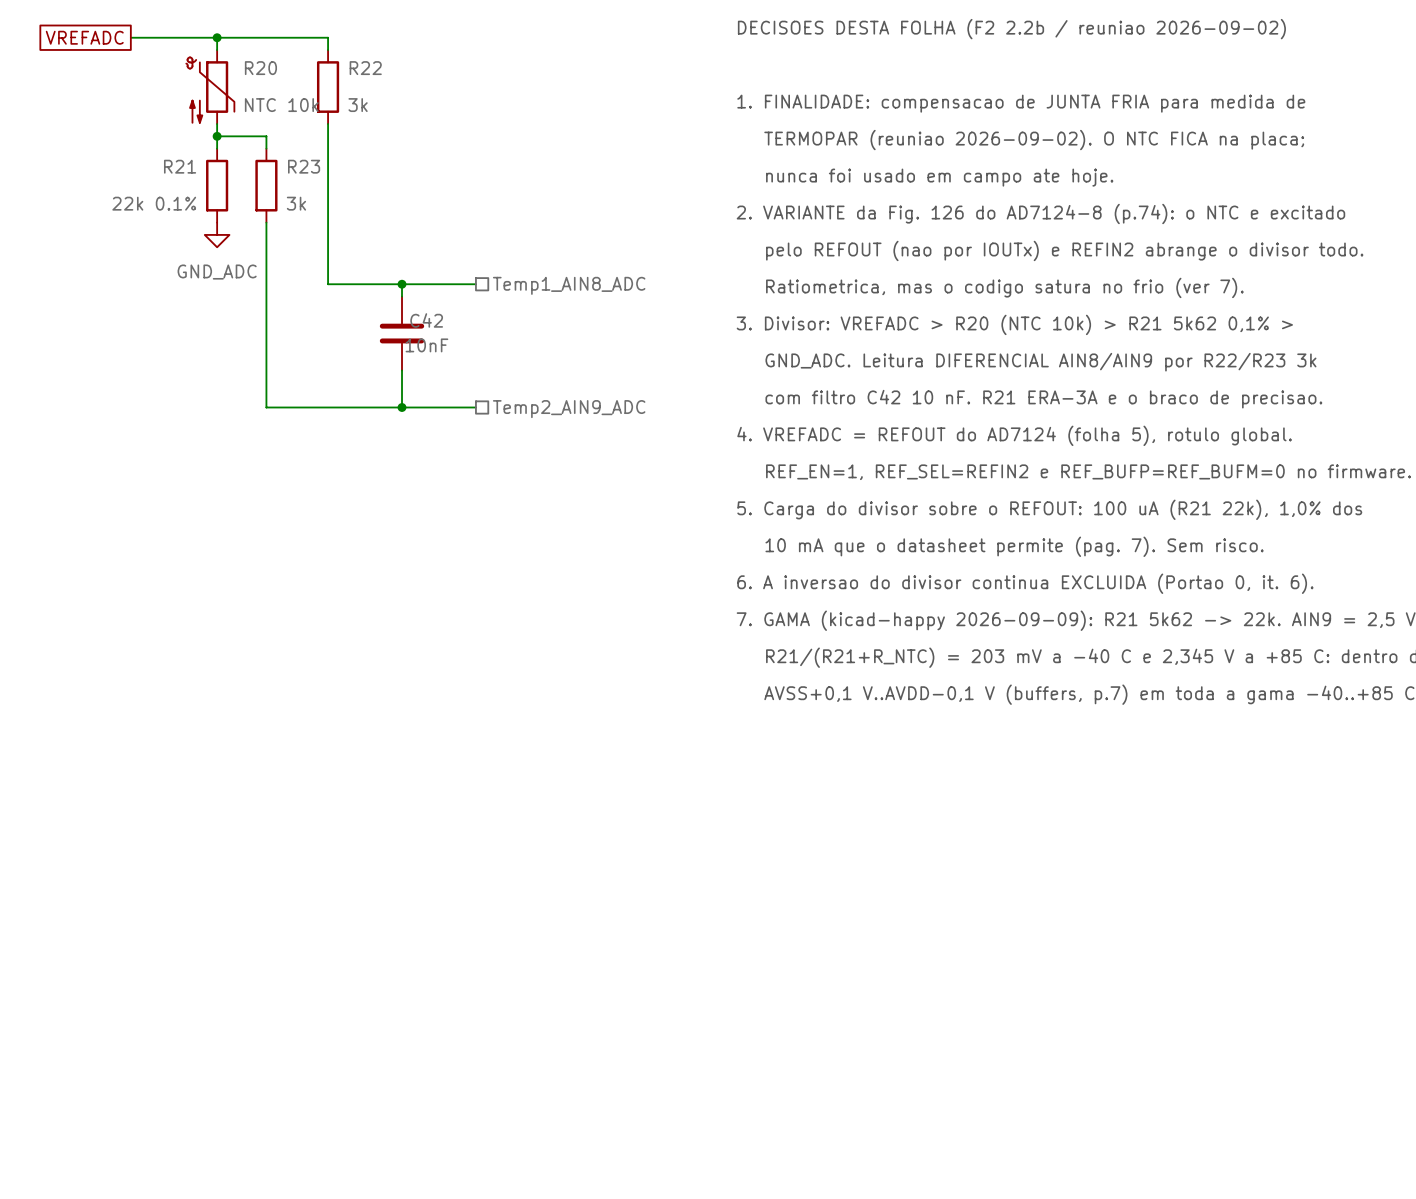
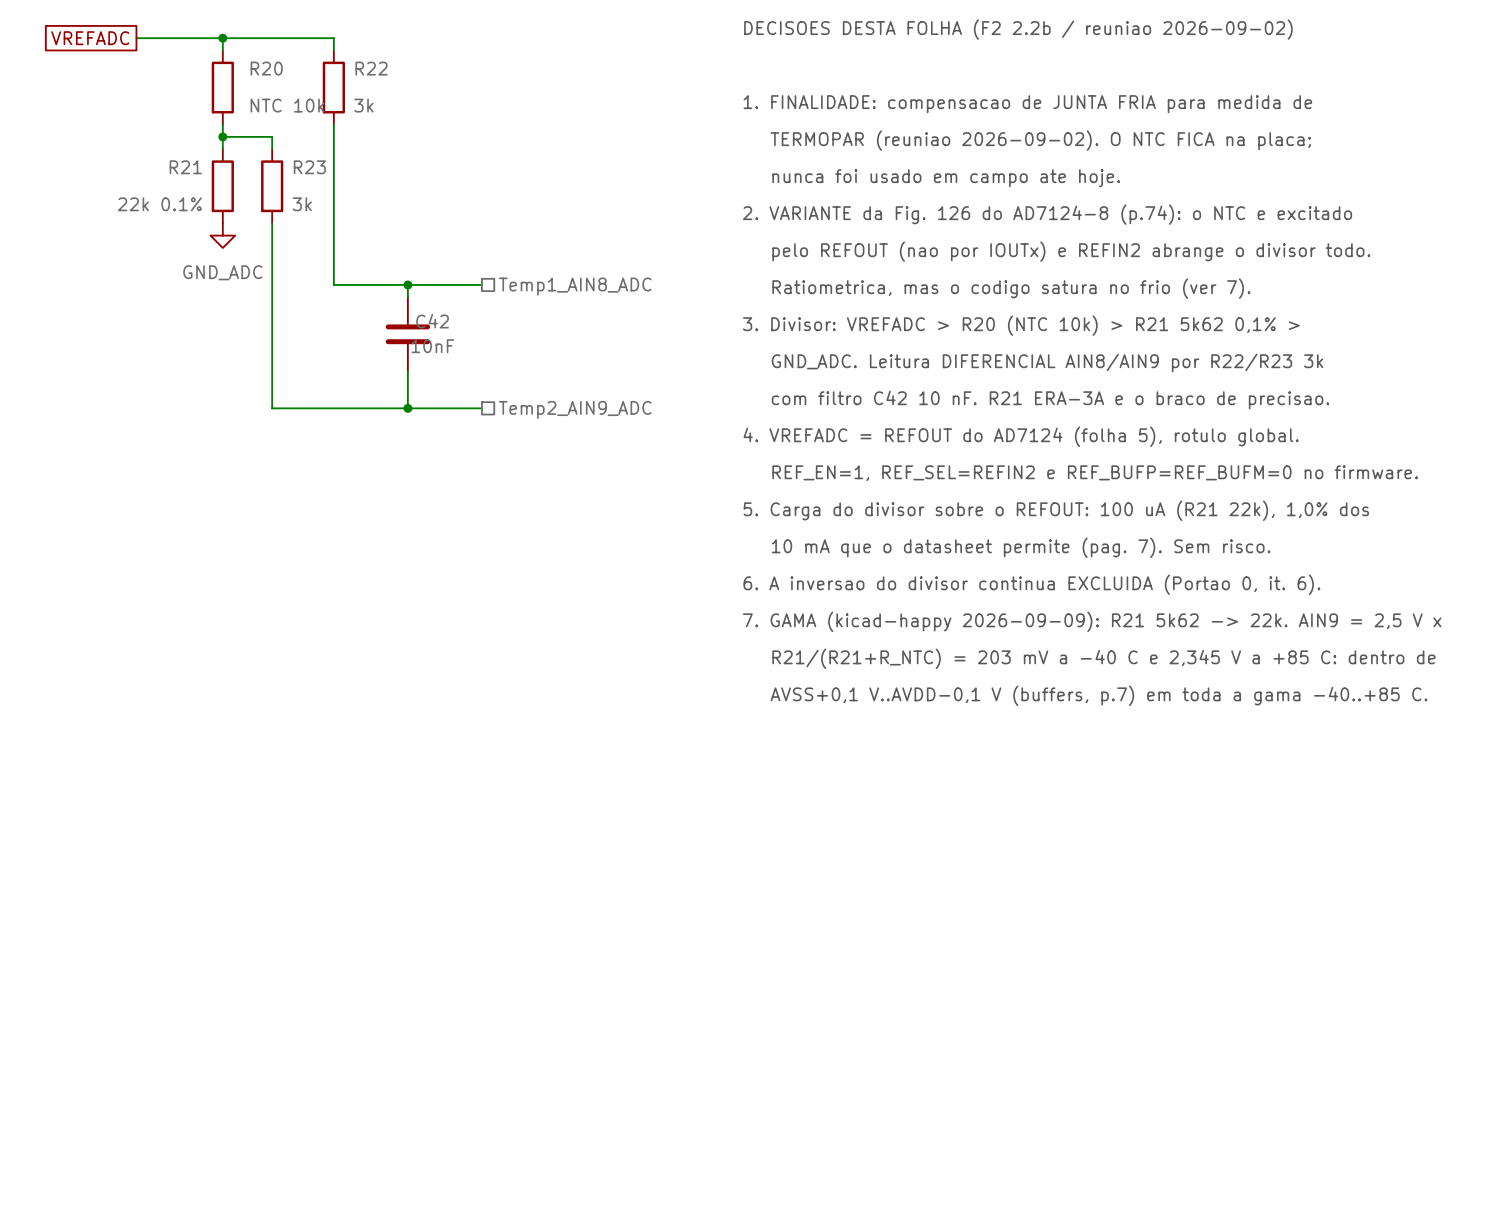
R20 symbol: [186, 50, 235, 125] -> [211, 50, 234, 125]

